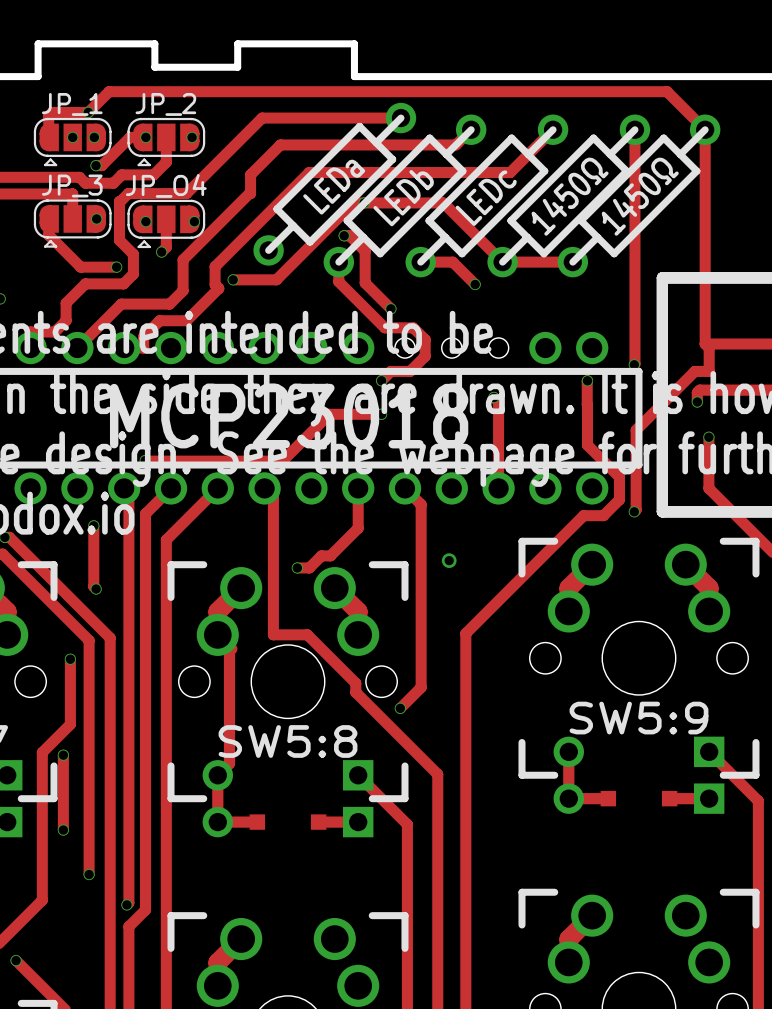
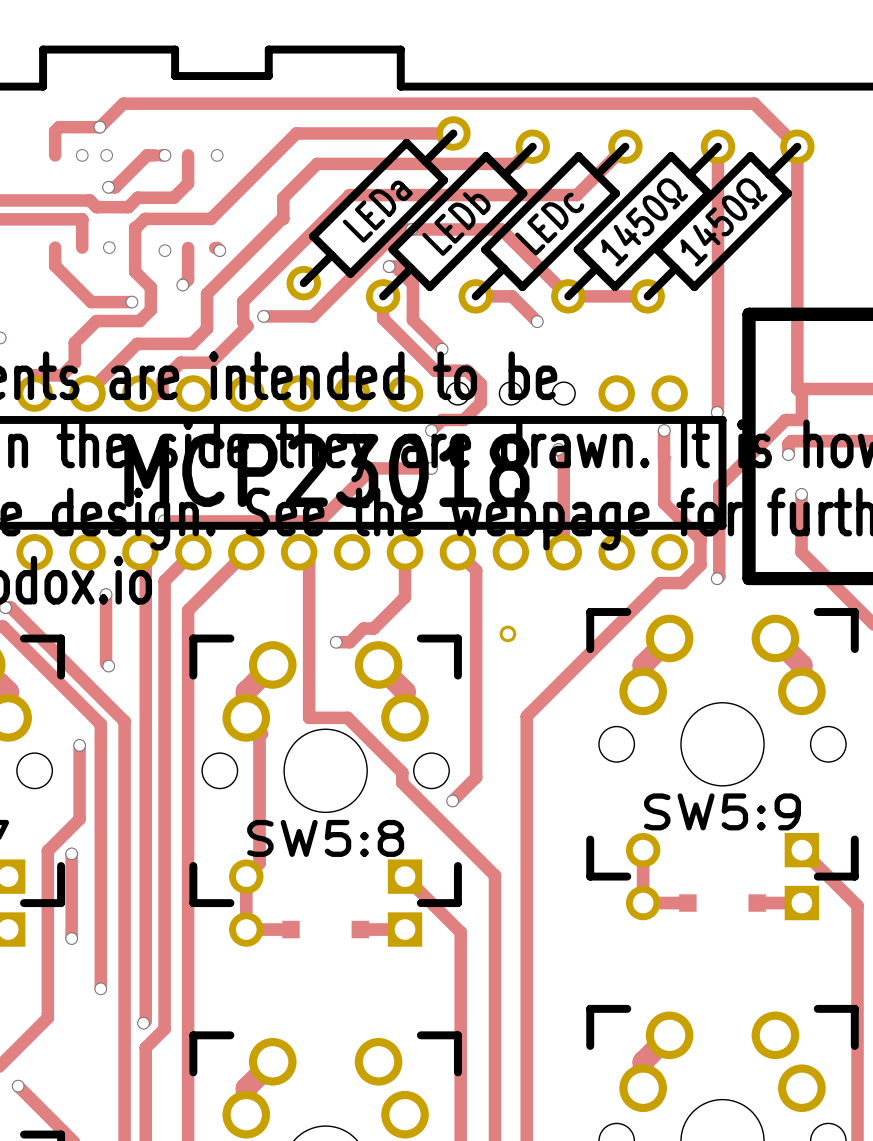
JP_1: (72, 142) -> none
JP_2: (166, 142) -> none
JP_3: (72, 223) -> none
JP_O4: (166, 223) -> none

